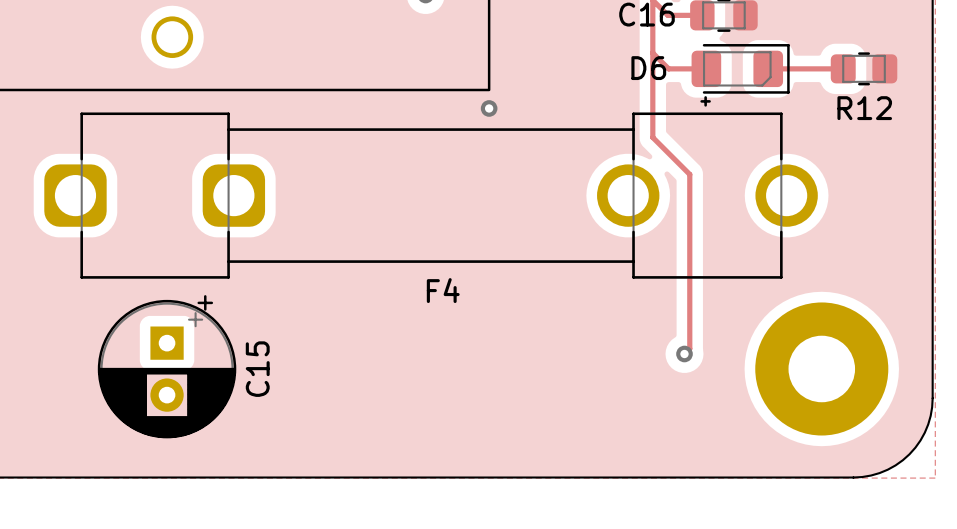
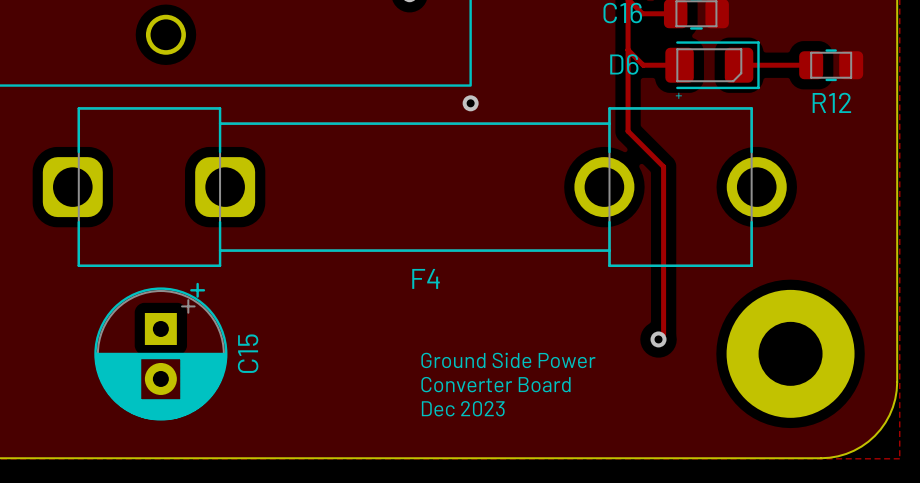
text: none -> Ground Side Power (508, 360)
text: none -> Converter Board (495, 384)
text: none -> Dec 2023 (463, 408)

